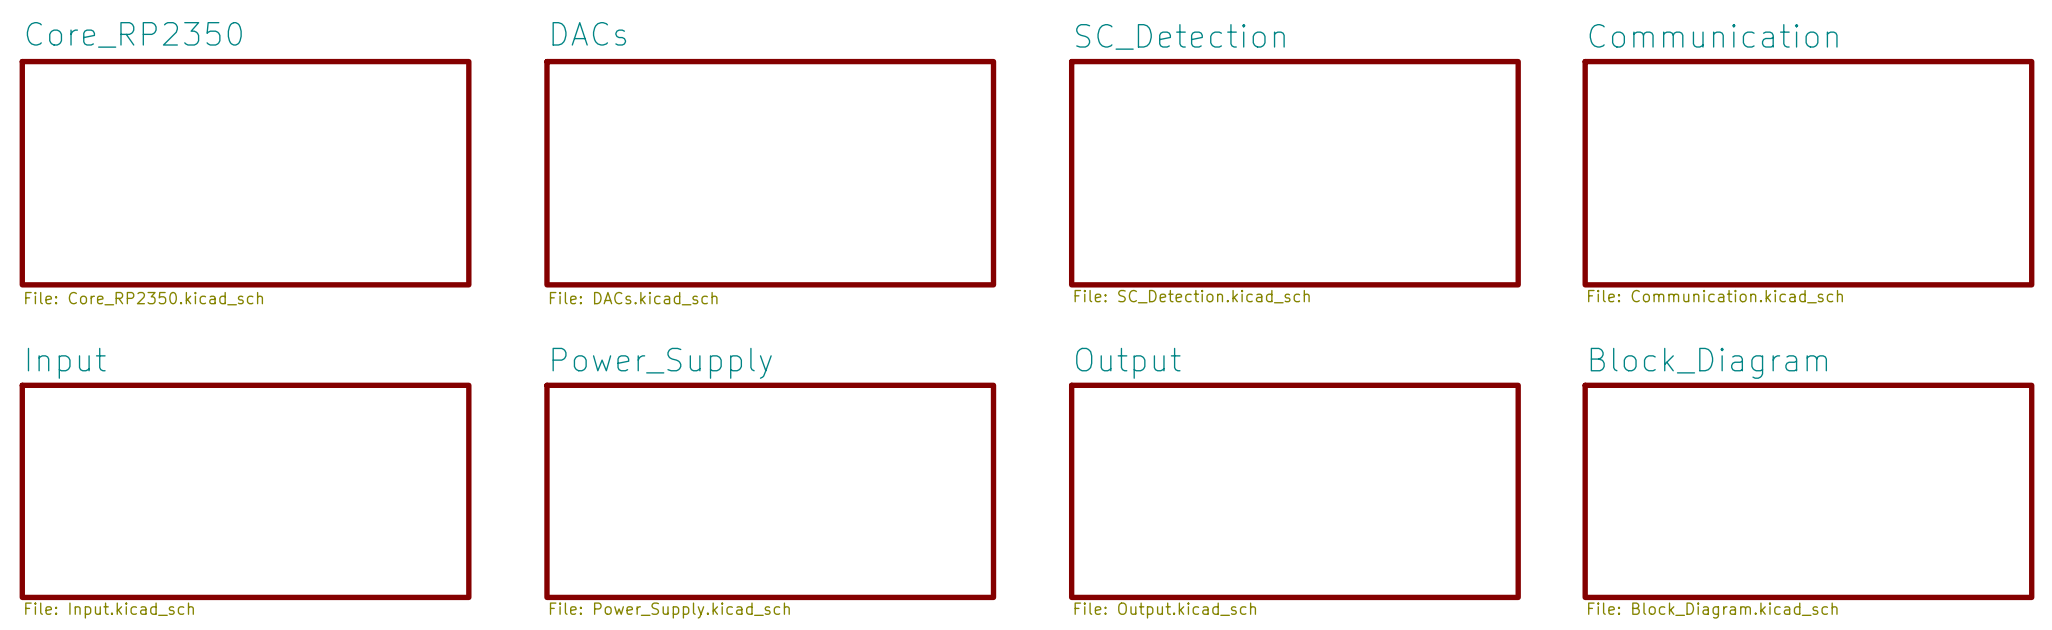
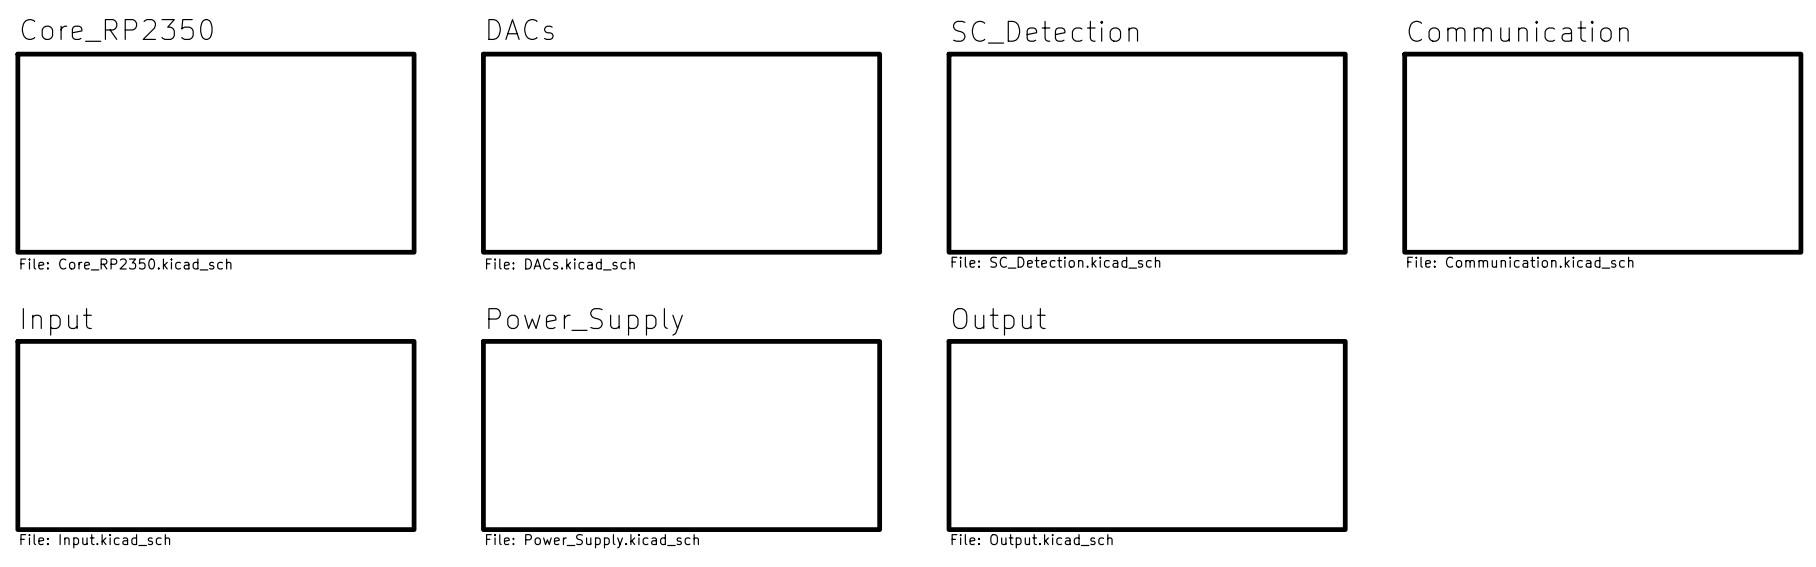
sheet Block_Diagram: File: Block_Diagram.kicad_sch (1808, 491) -> none

